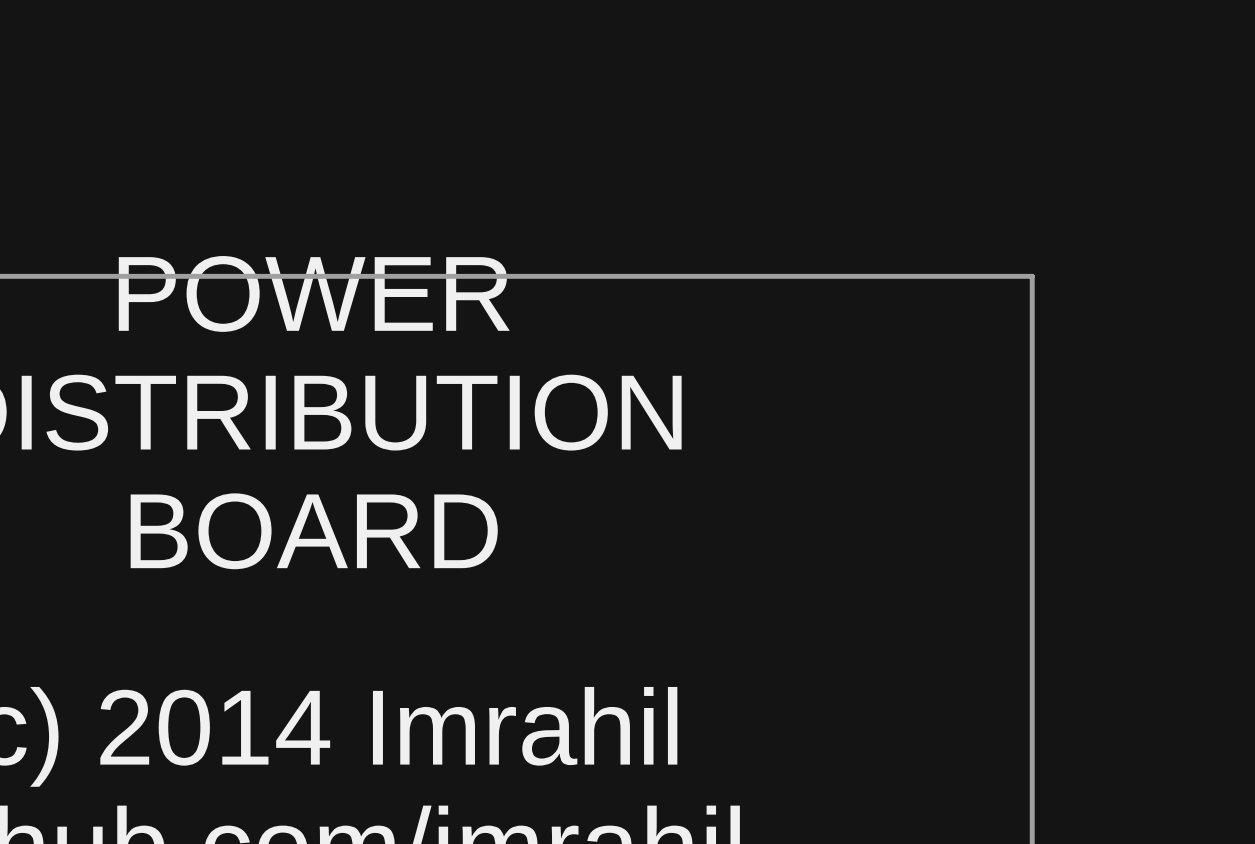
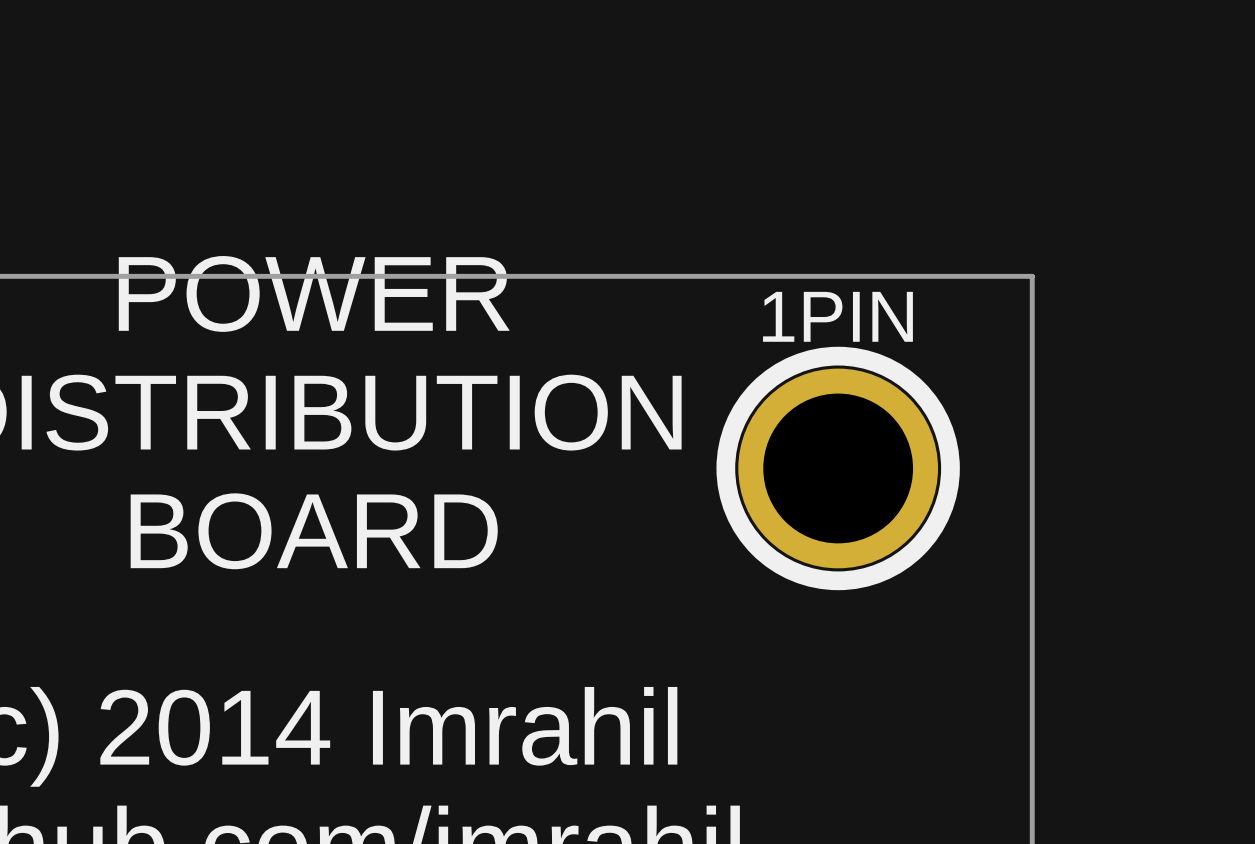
1PIN: none -> (838, 468)

